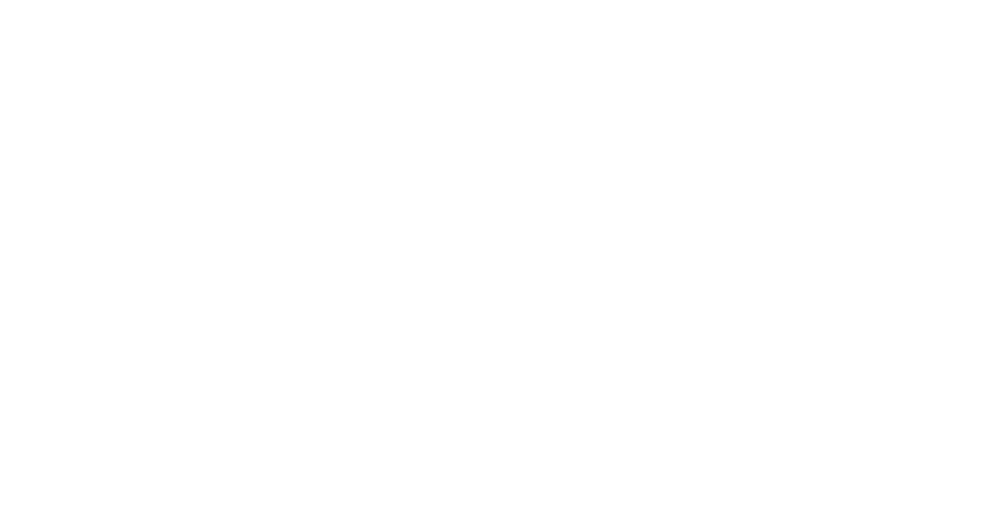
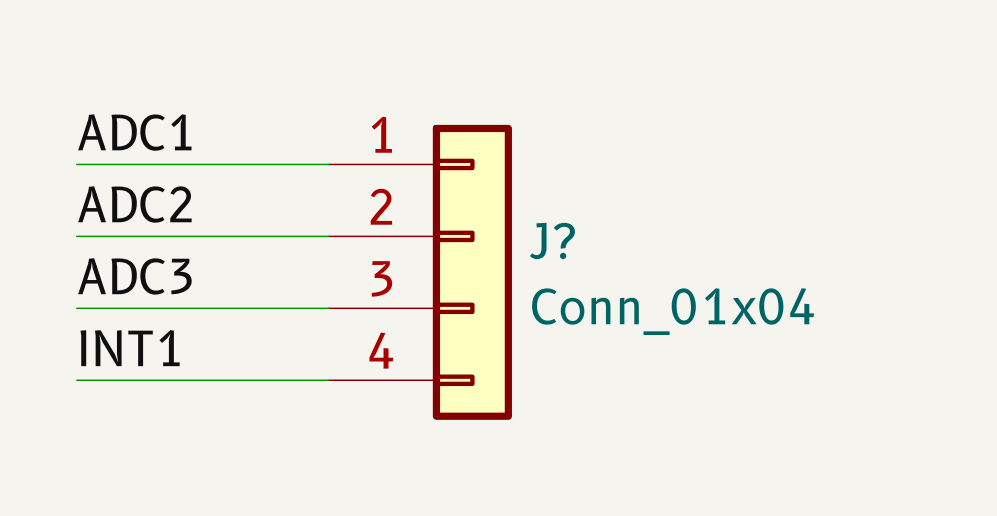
label: none -> ADC1 (134, 132)
wire: none -> (76, 164) (328, 164)
label: none -> ADC2 (134, 204)
wire: none -> (76, 236) (328, 236)
J?: none -> Conn_01x04 (420, 272)
label: none -> ADC3 (134, 276)
wire: none -> (76, 308) (328, 308)
label: none -> INT1 (130, 348)
wire: none -> (76, 380) (328, 380)

